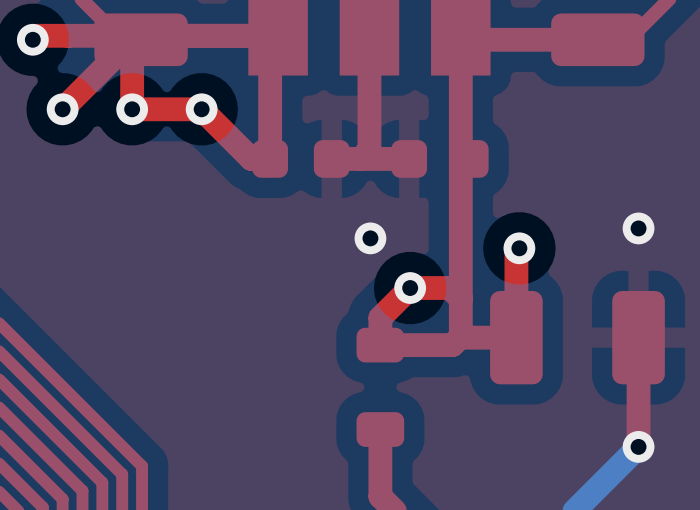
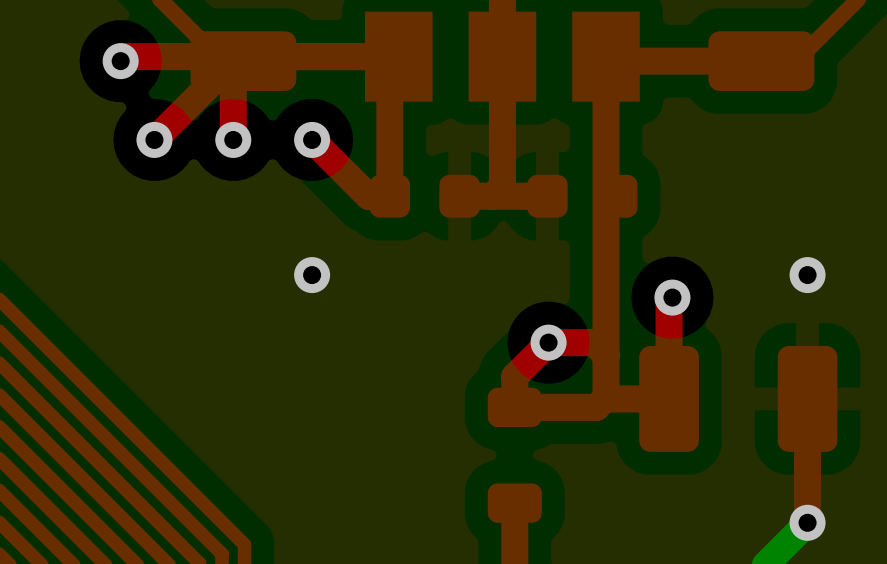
top track: (201, 109) (132, 109) -> none
via position: (370, 238) -> (312, 275)

